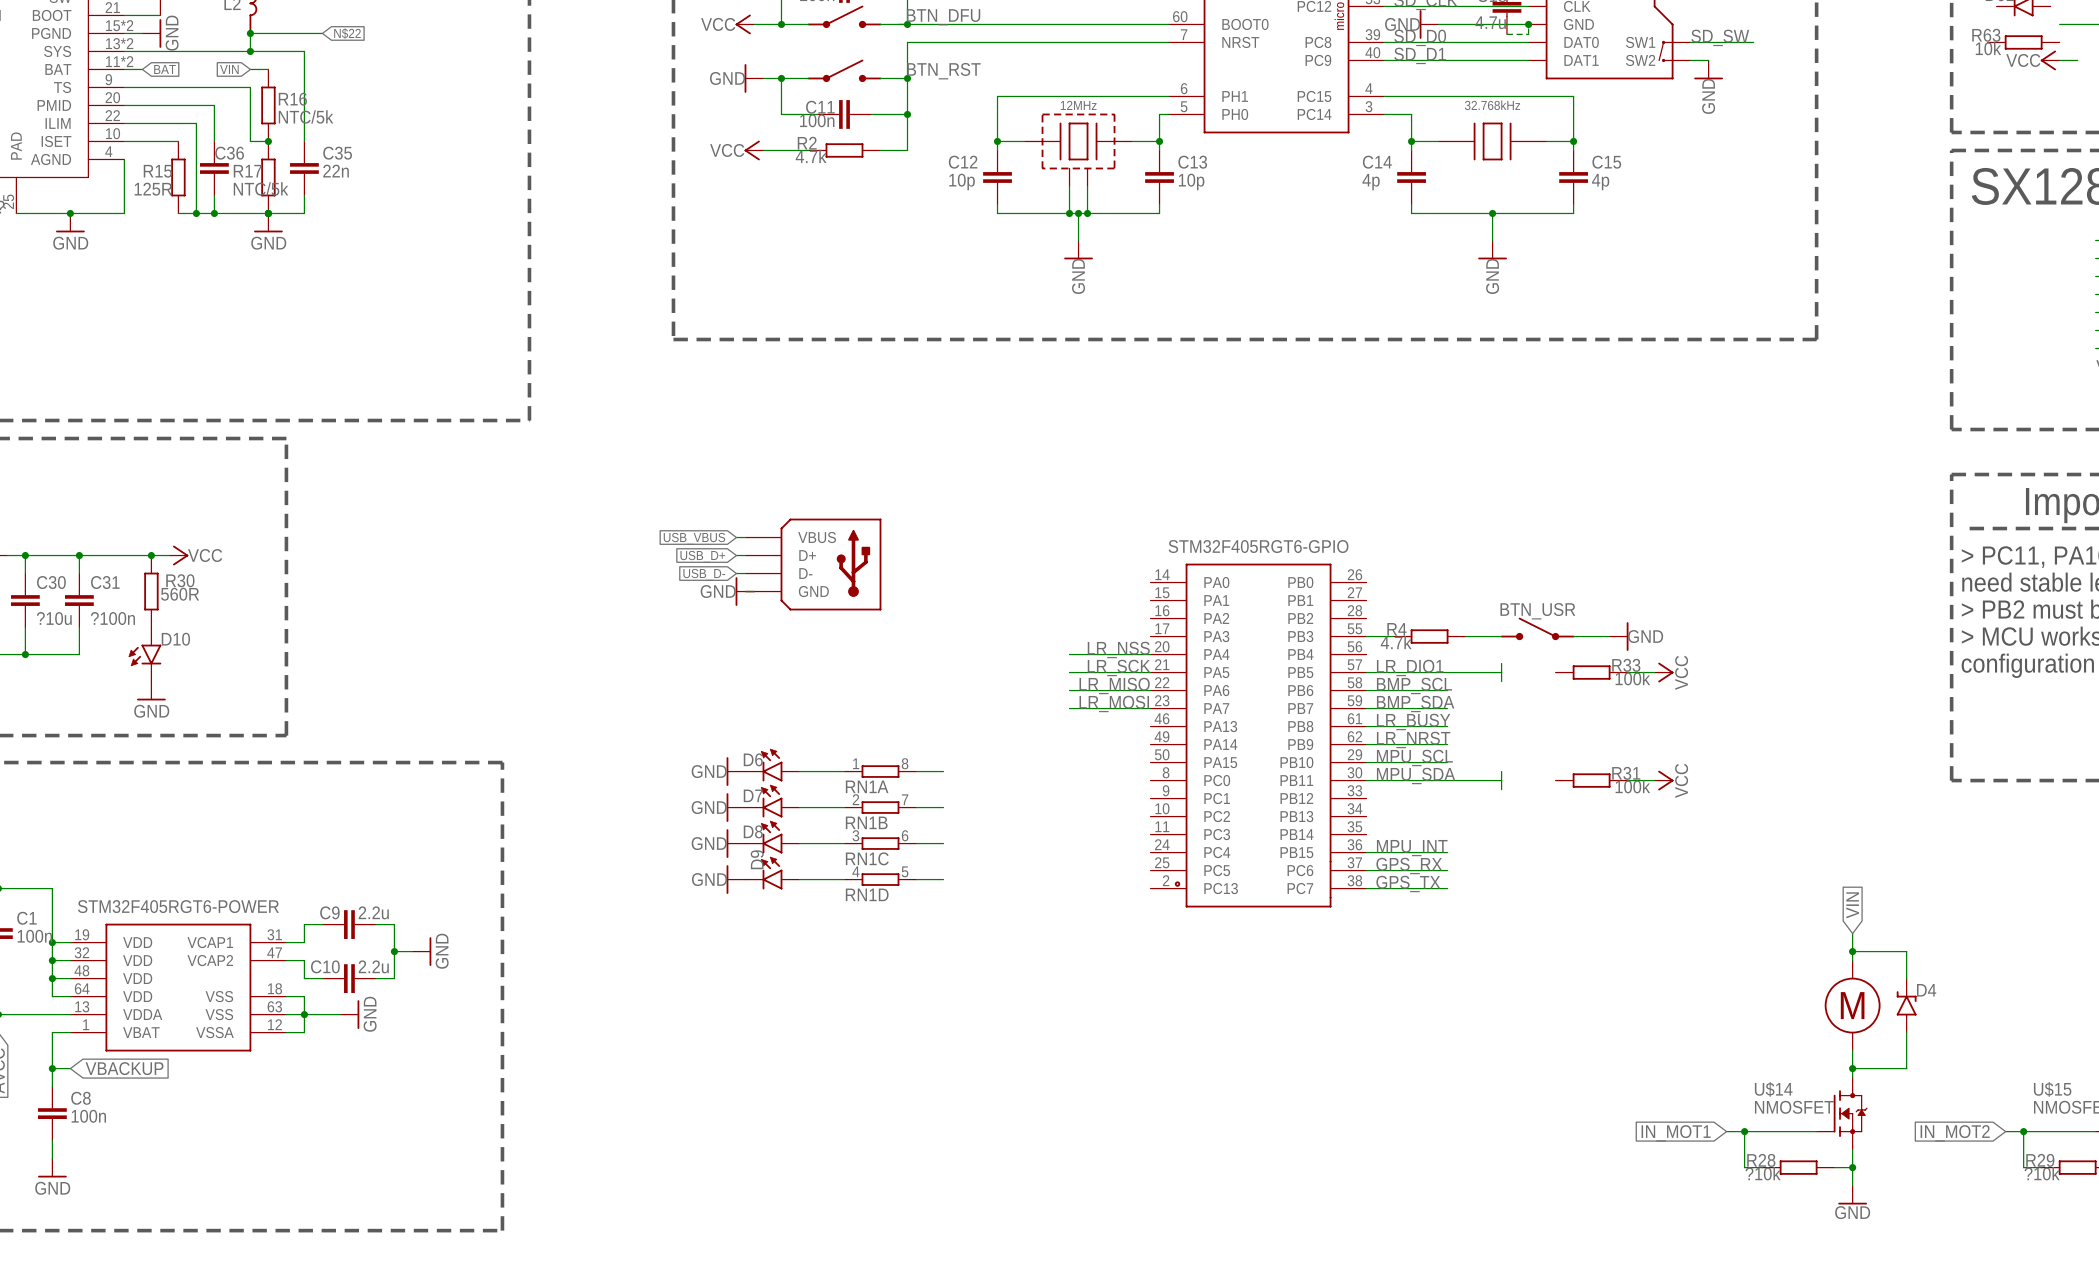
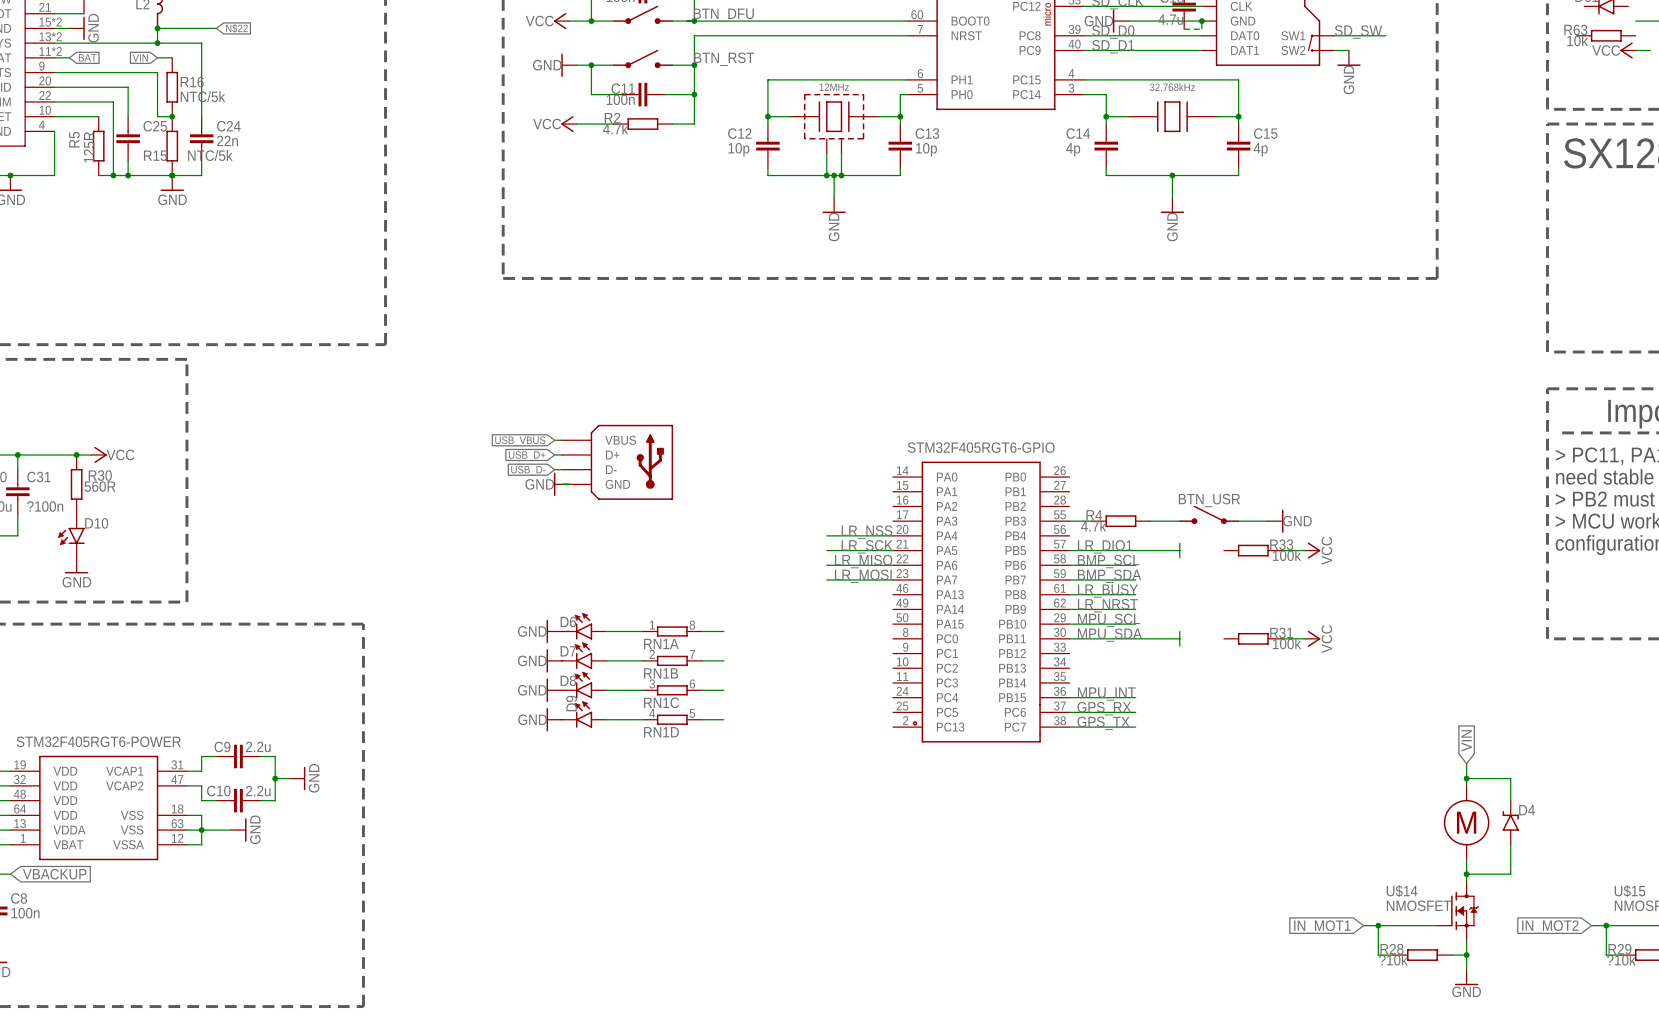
C36 name: C36 (229, 153) -> C25 (155, 126)
C35 name: C35 (337, 153) -> C24 (228, 126)
R15 name: R15 (157, 171) -> R5 (74, 139)
R17 name: R17 (247, 171) -> R15 (155, 155)
R17 value position: NTC/5k (261, 188) -> NTC/5k (210, 155)
R15 value rotation: 0° (153, 189) -> 90° counterclockwise (89, 147)

